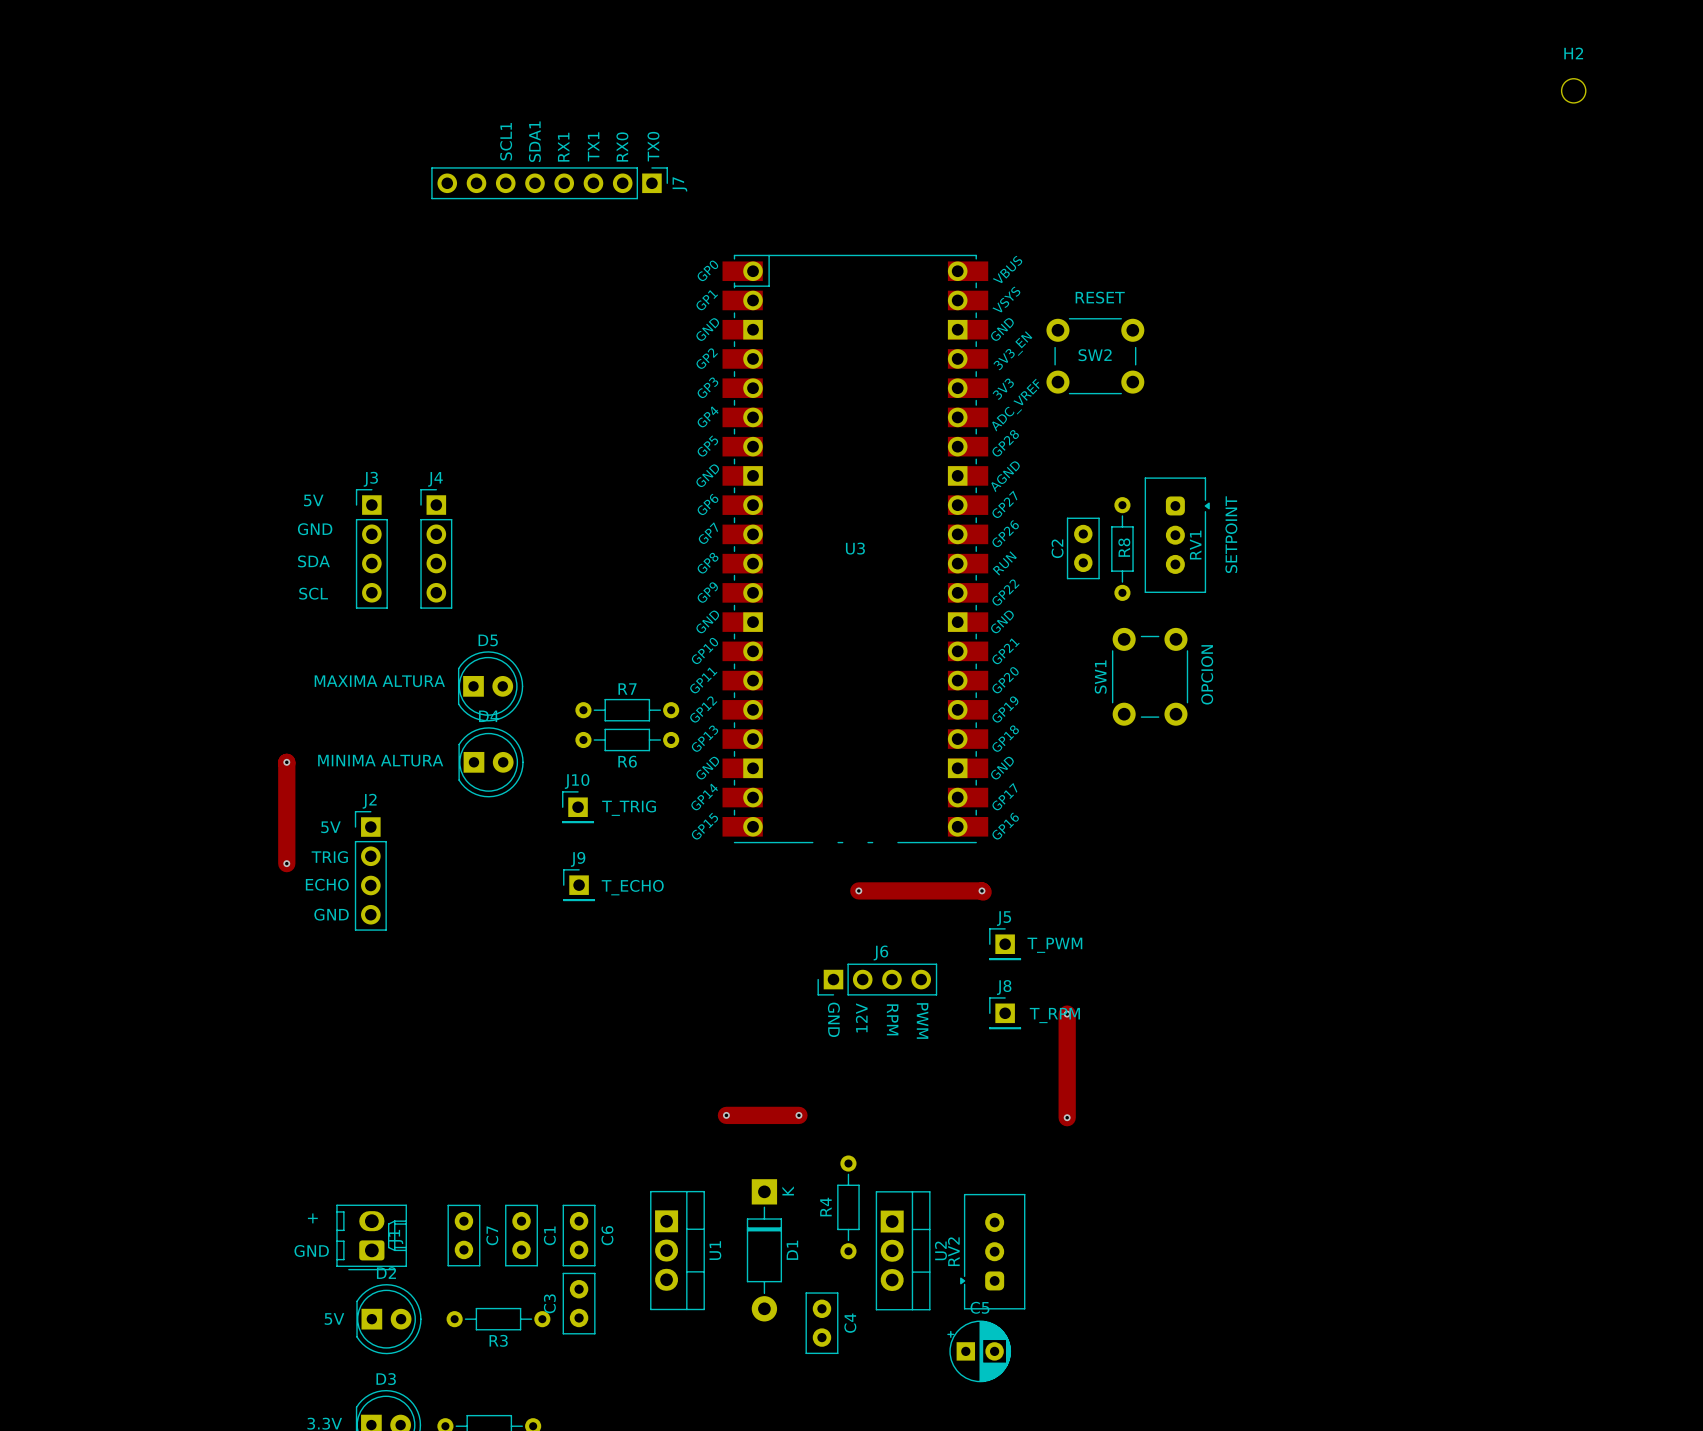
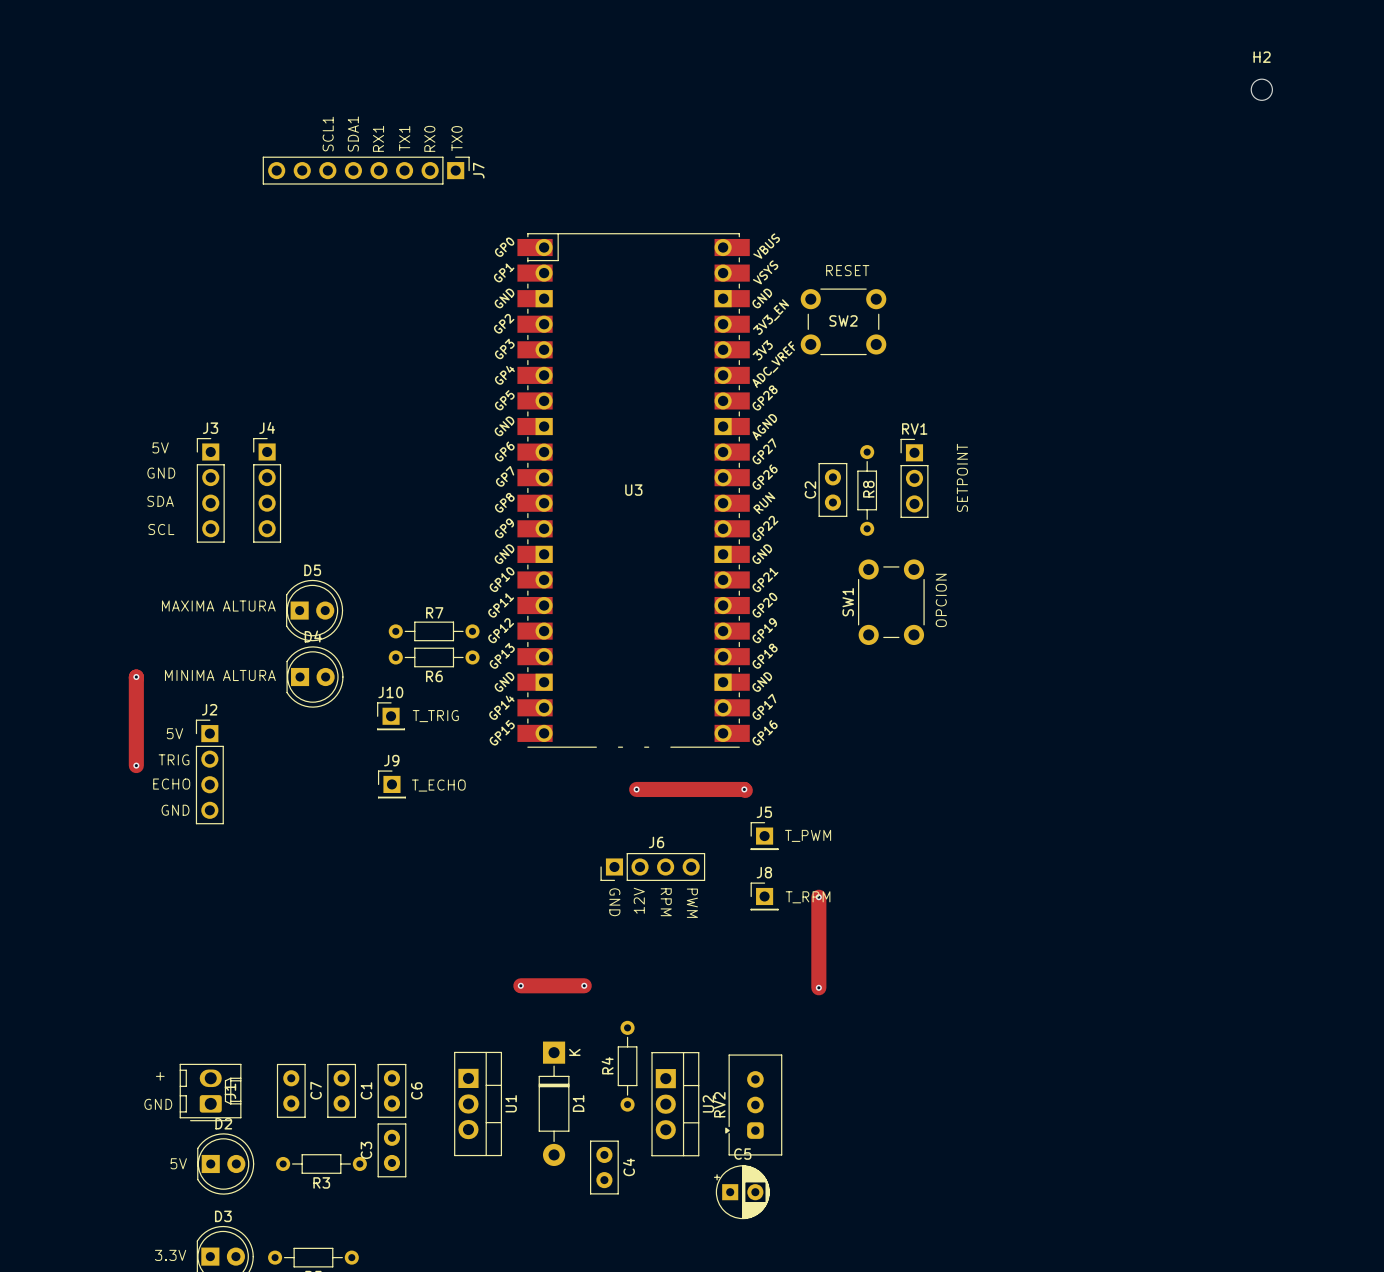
RV1 footprint: [1144, 477, 1210, 593] -> [900, 438, 929, 518]
RV1 name position: RV1 (1195, 545) -> RV1 (914, 428)

